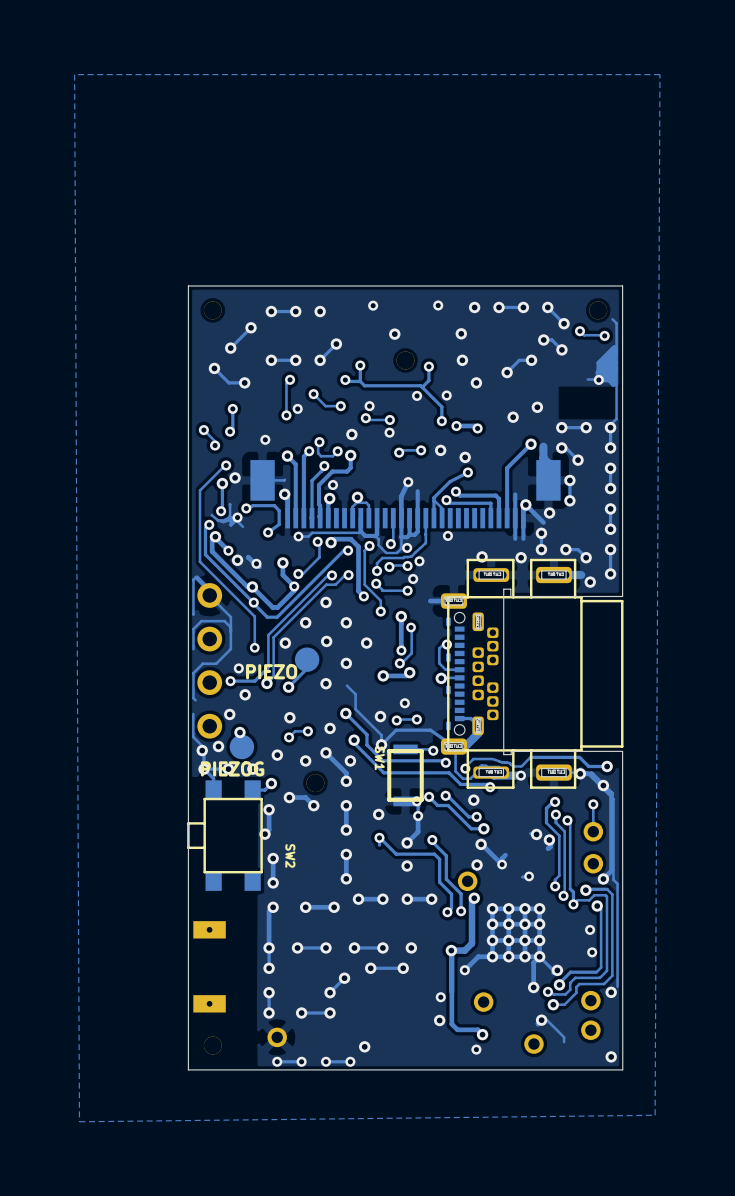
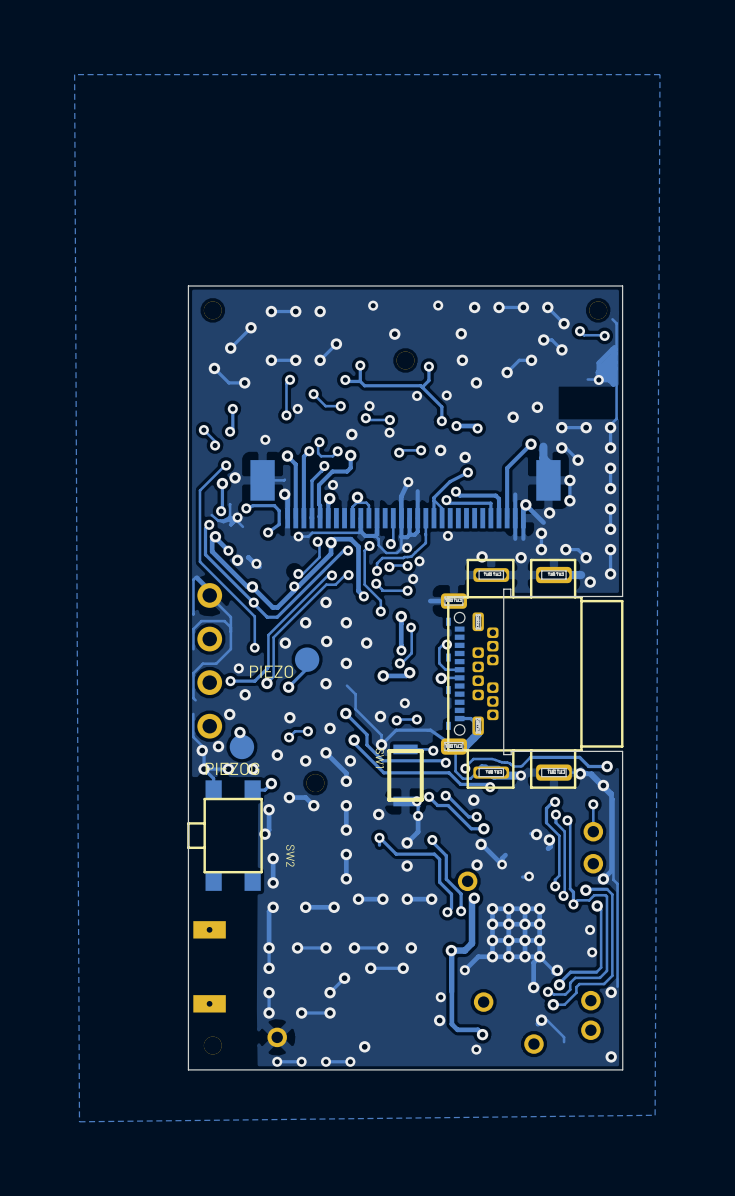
track: (282, 562) (282, 575) (294, 586) -> (331, 542) (331, 553) (298, 586) (294, 586)
via: (282, 562) -> none

